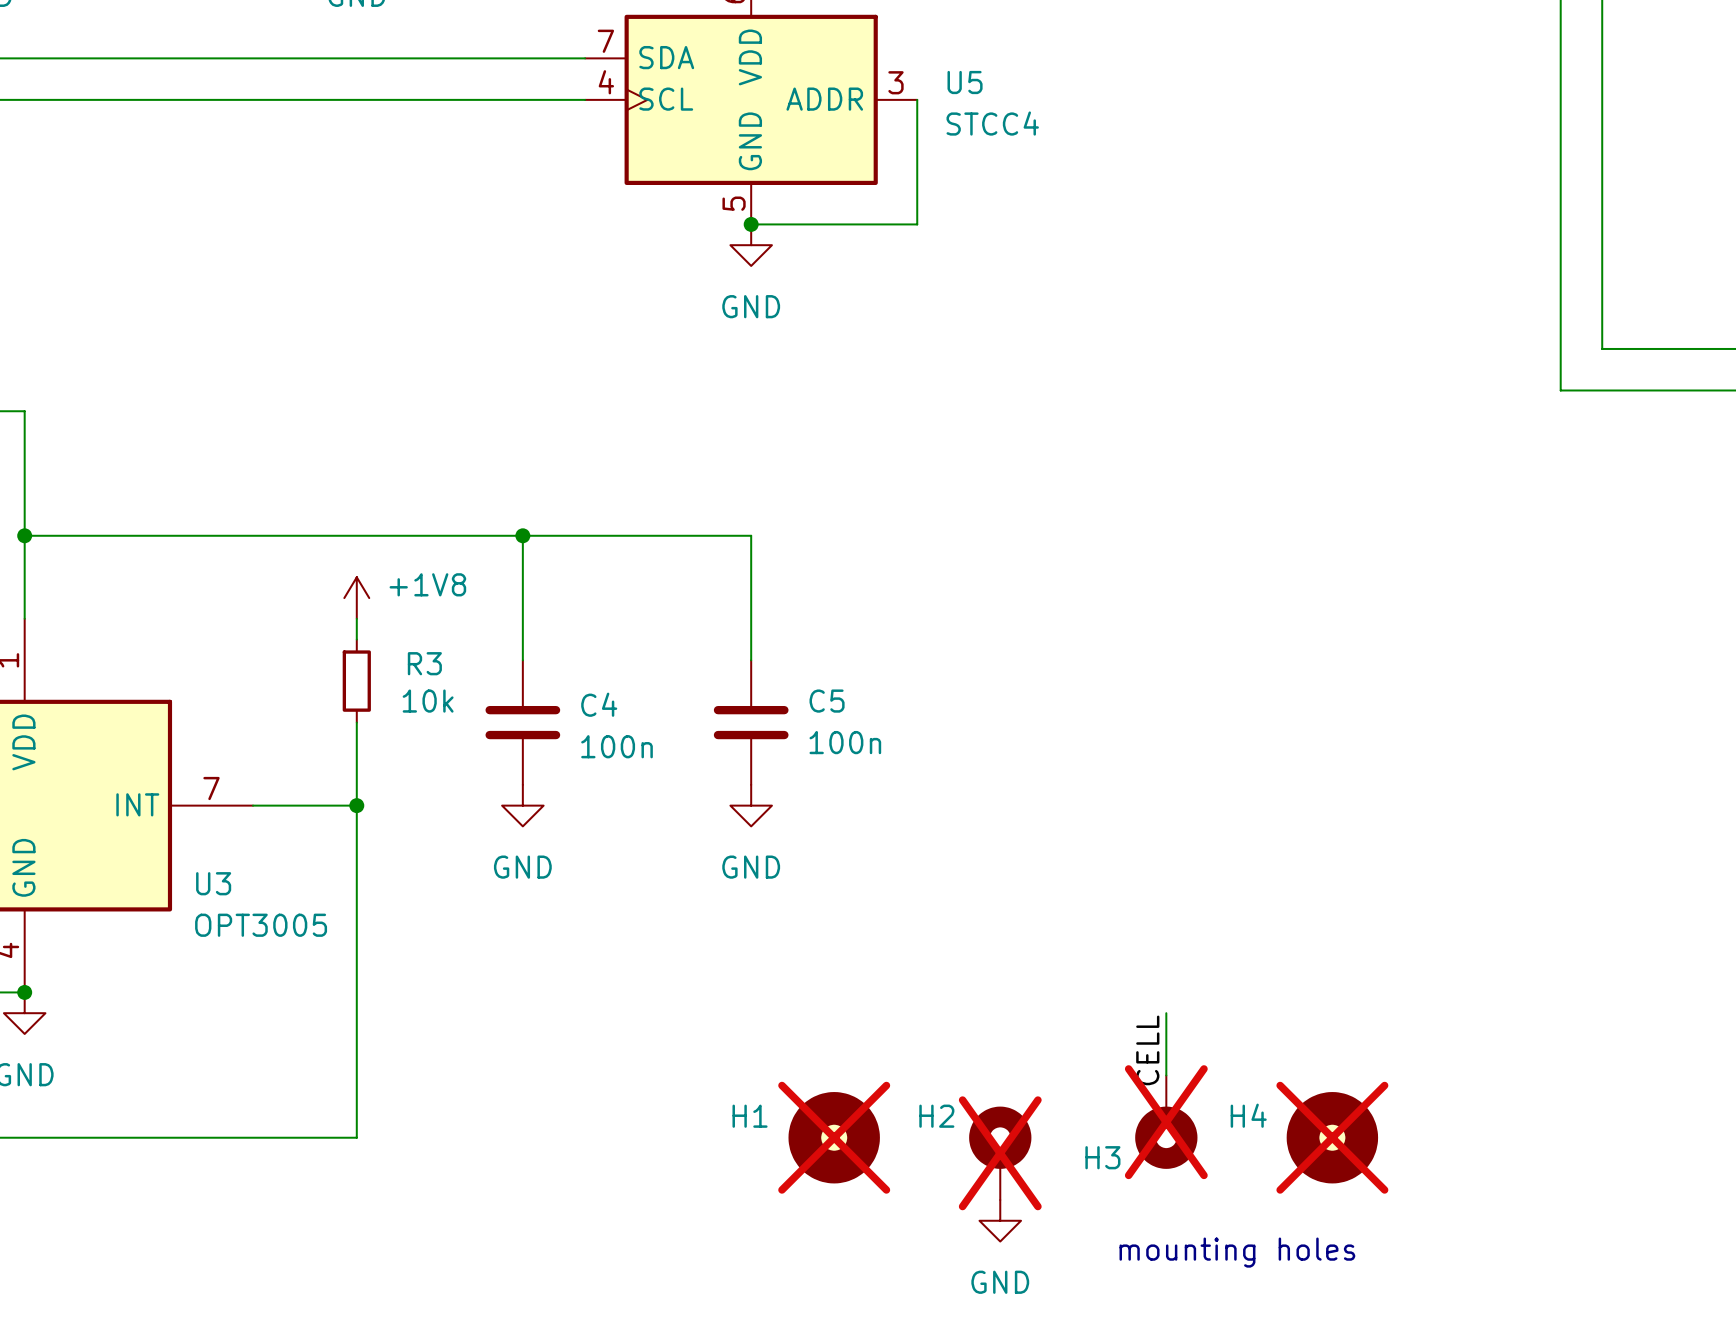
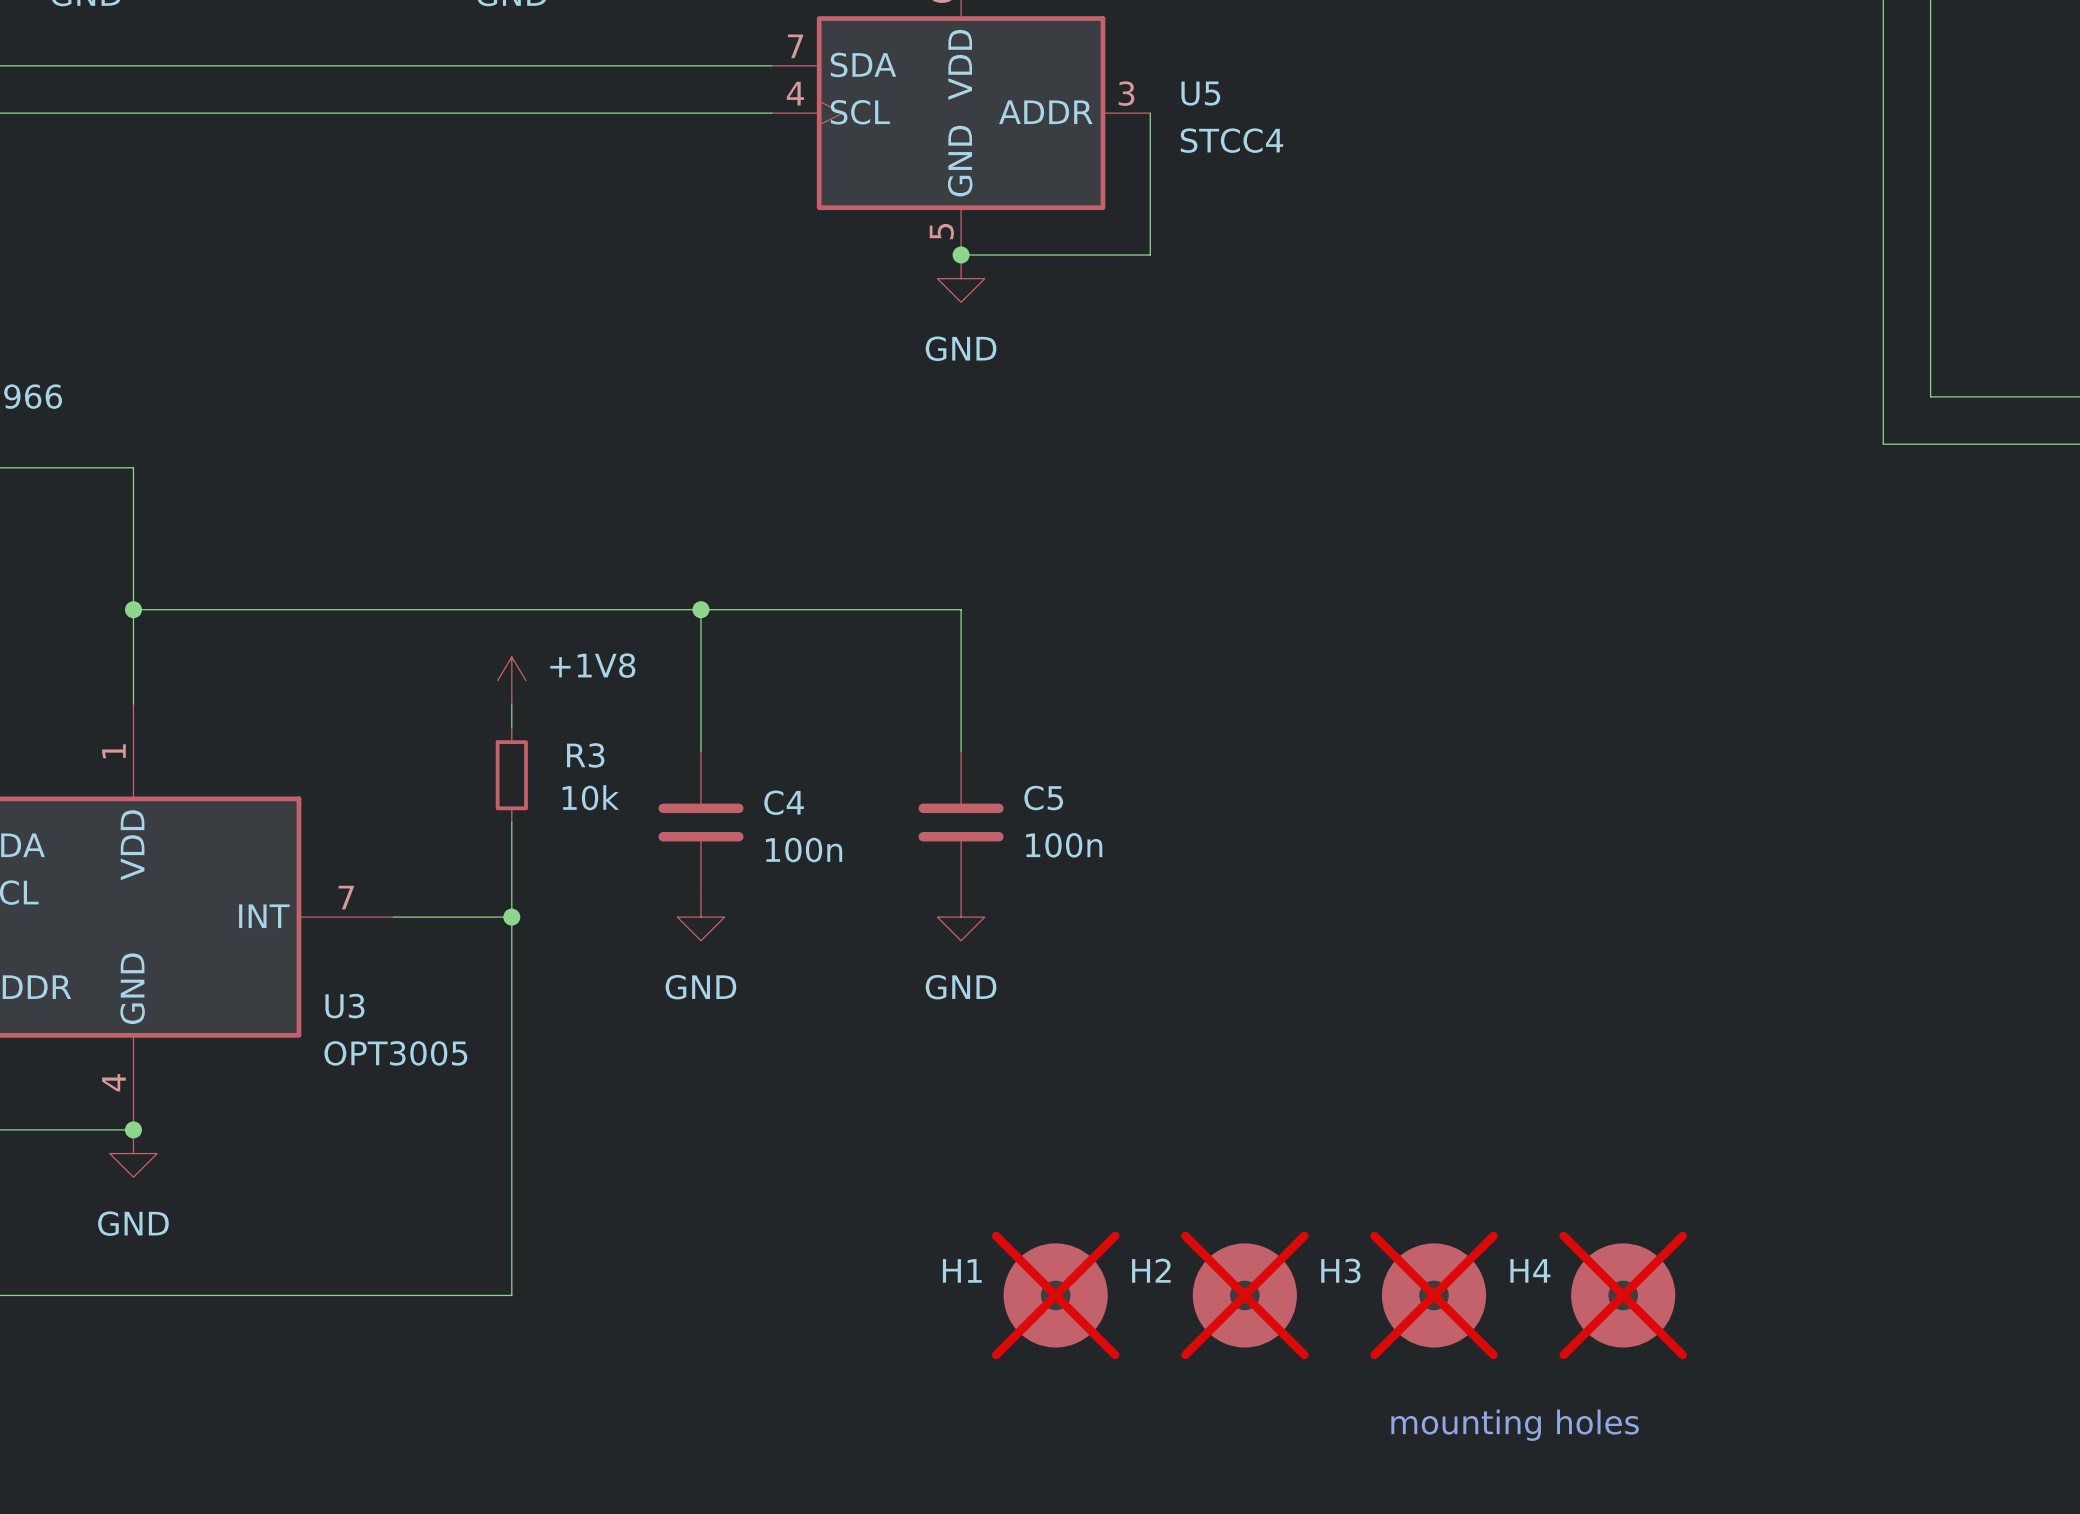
wire: (1166, 1013) (1166, 1075) -> none
label: CELL (1147, 1050) -> none
H3 symbol: [1135, 1075, 1198, 1169] -> [1381, 1243, 1487, 1348]
H2 symbol: [969, 1106, 1032, 1201] -> [1192, 1243, 1297, 1348]
H3 name position: H3 (1102, 1157) -> H3 (1340, 1270)
power symbol: GND (1000, 1220) -> none

